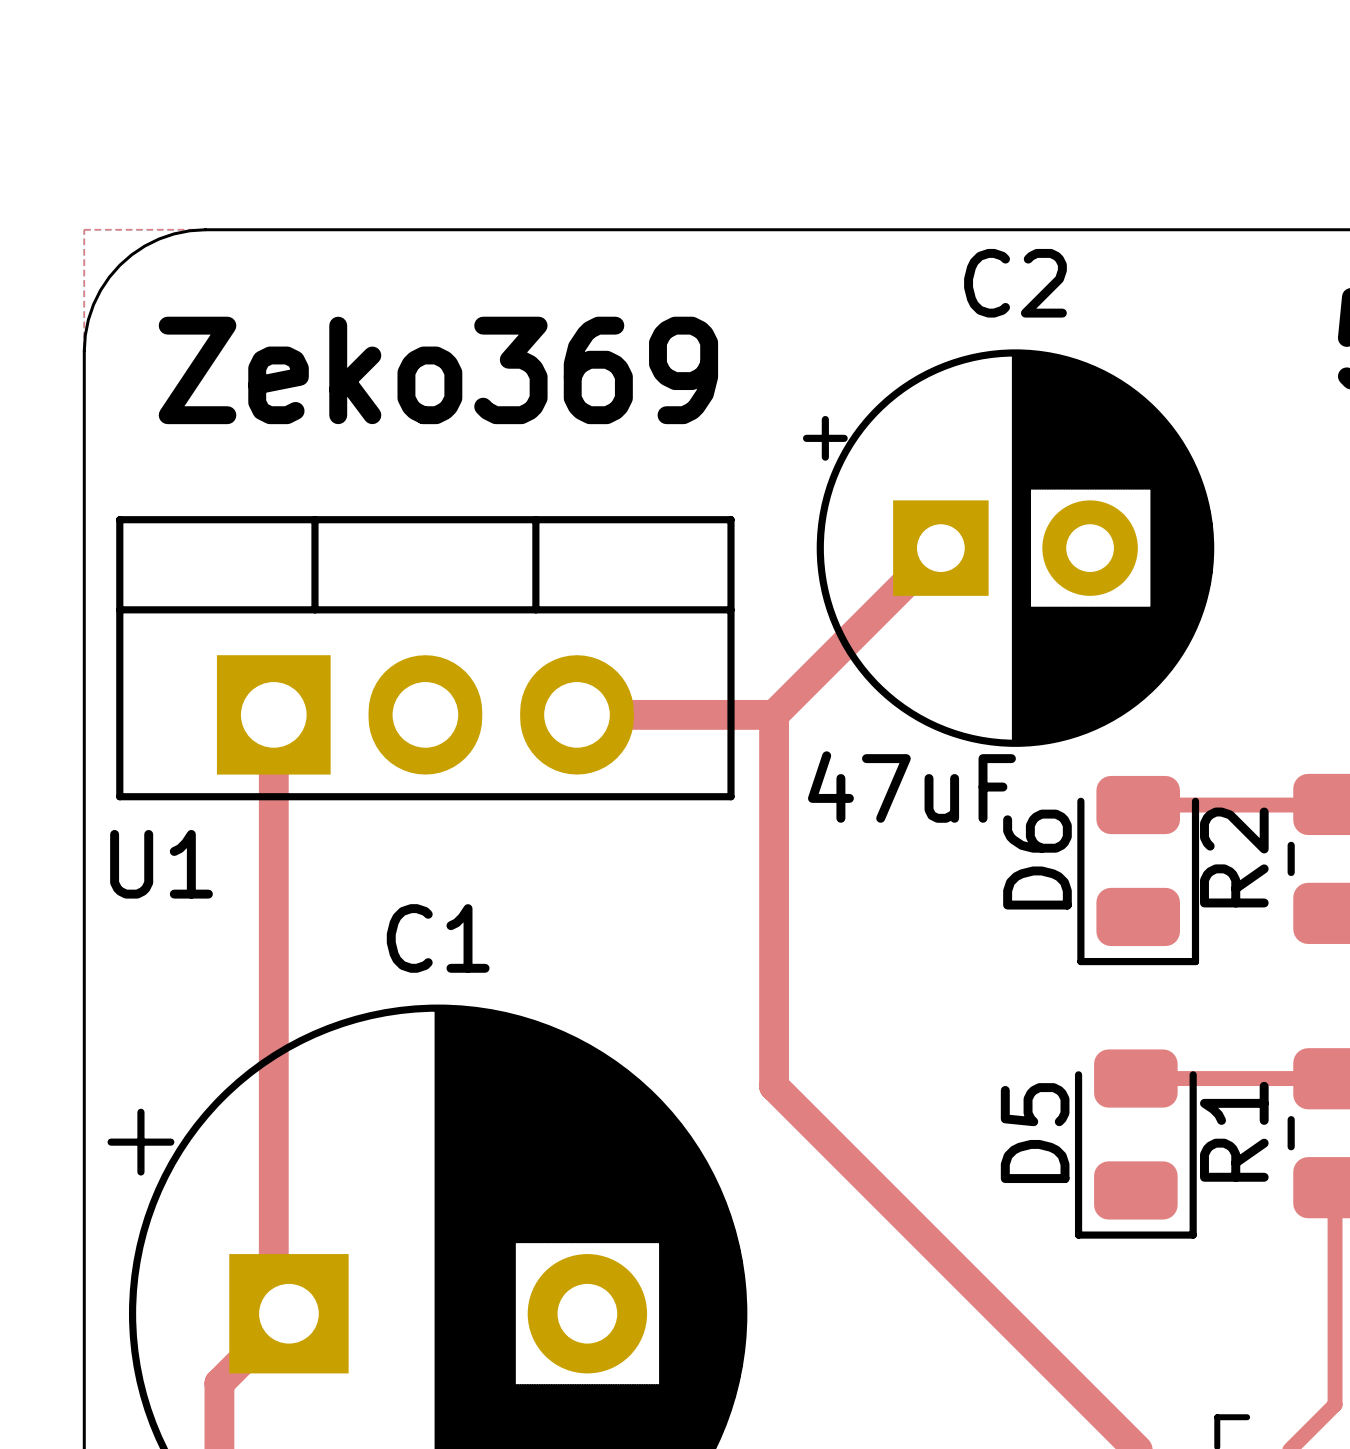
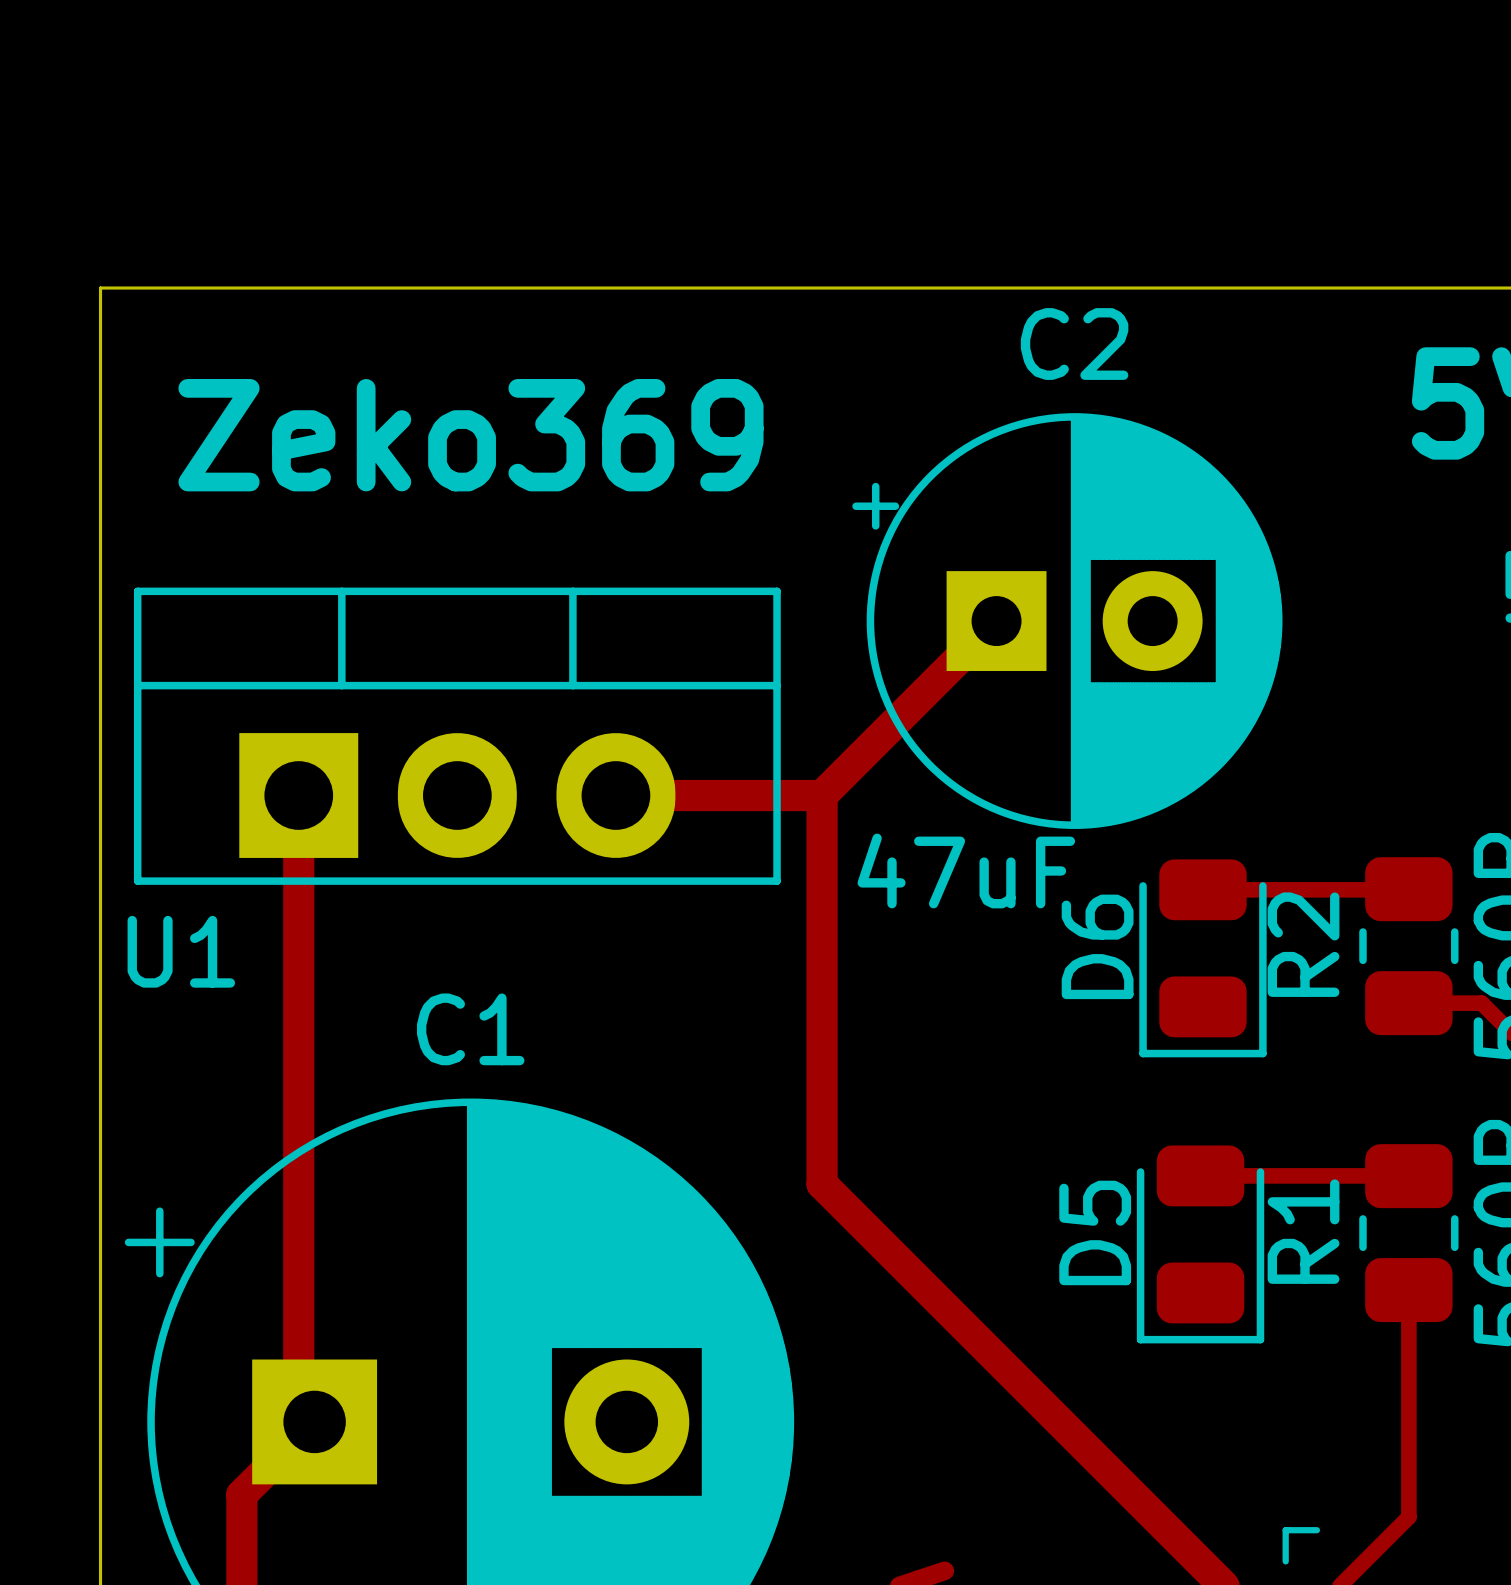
board edge: (205, 229) (189, 230) (159, 238) (131, 254) (119, 265) (100, 290) (93, 304) (88, 319) (84, 351) -> (227, 288) (100, 288) (100, 414)

